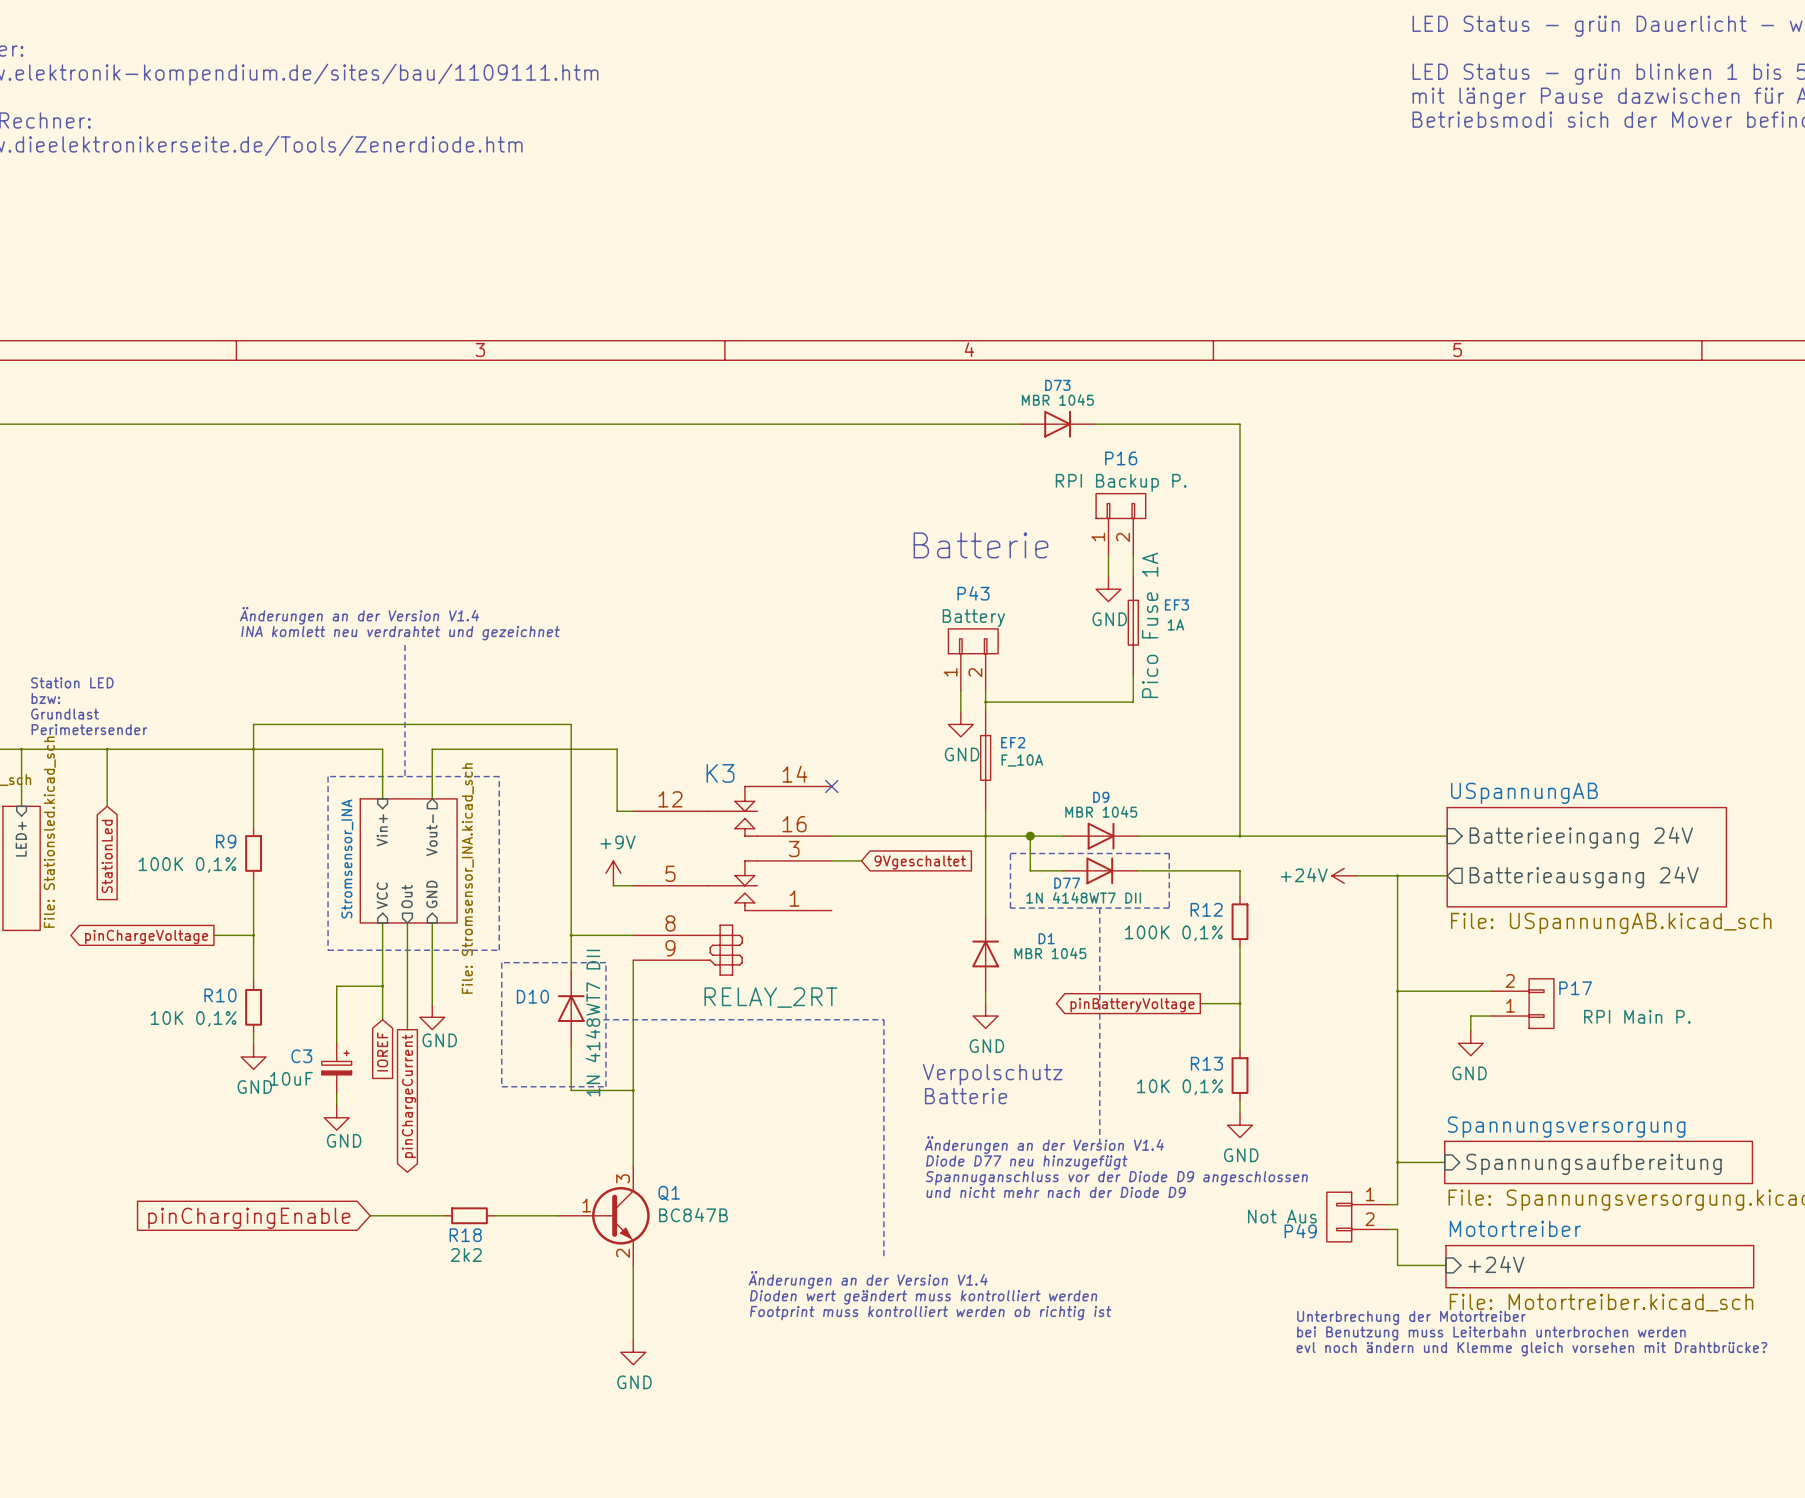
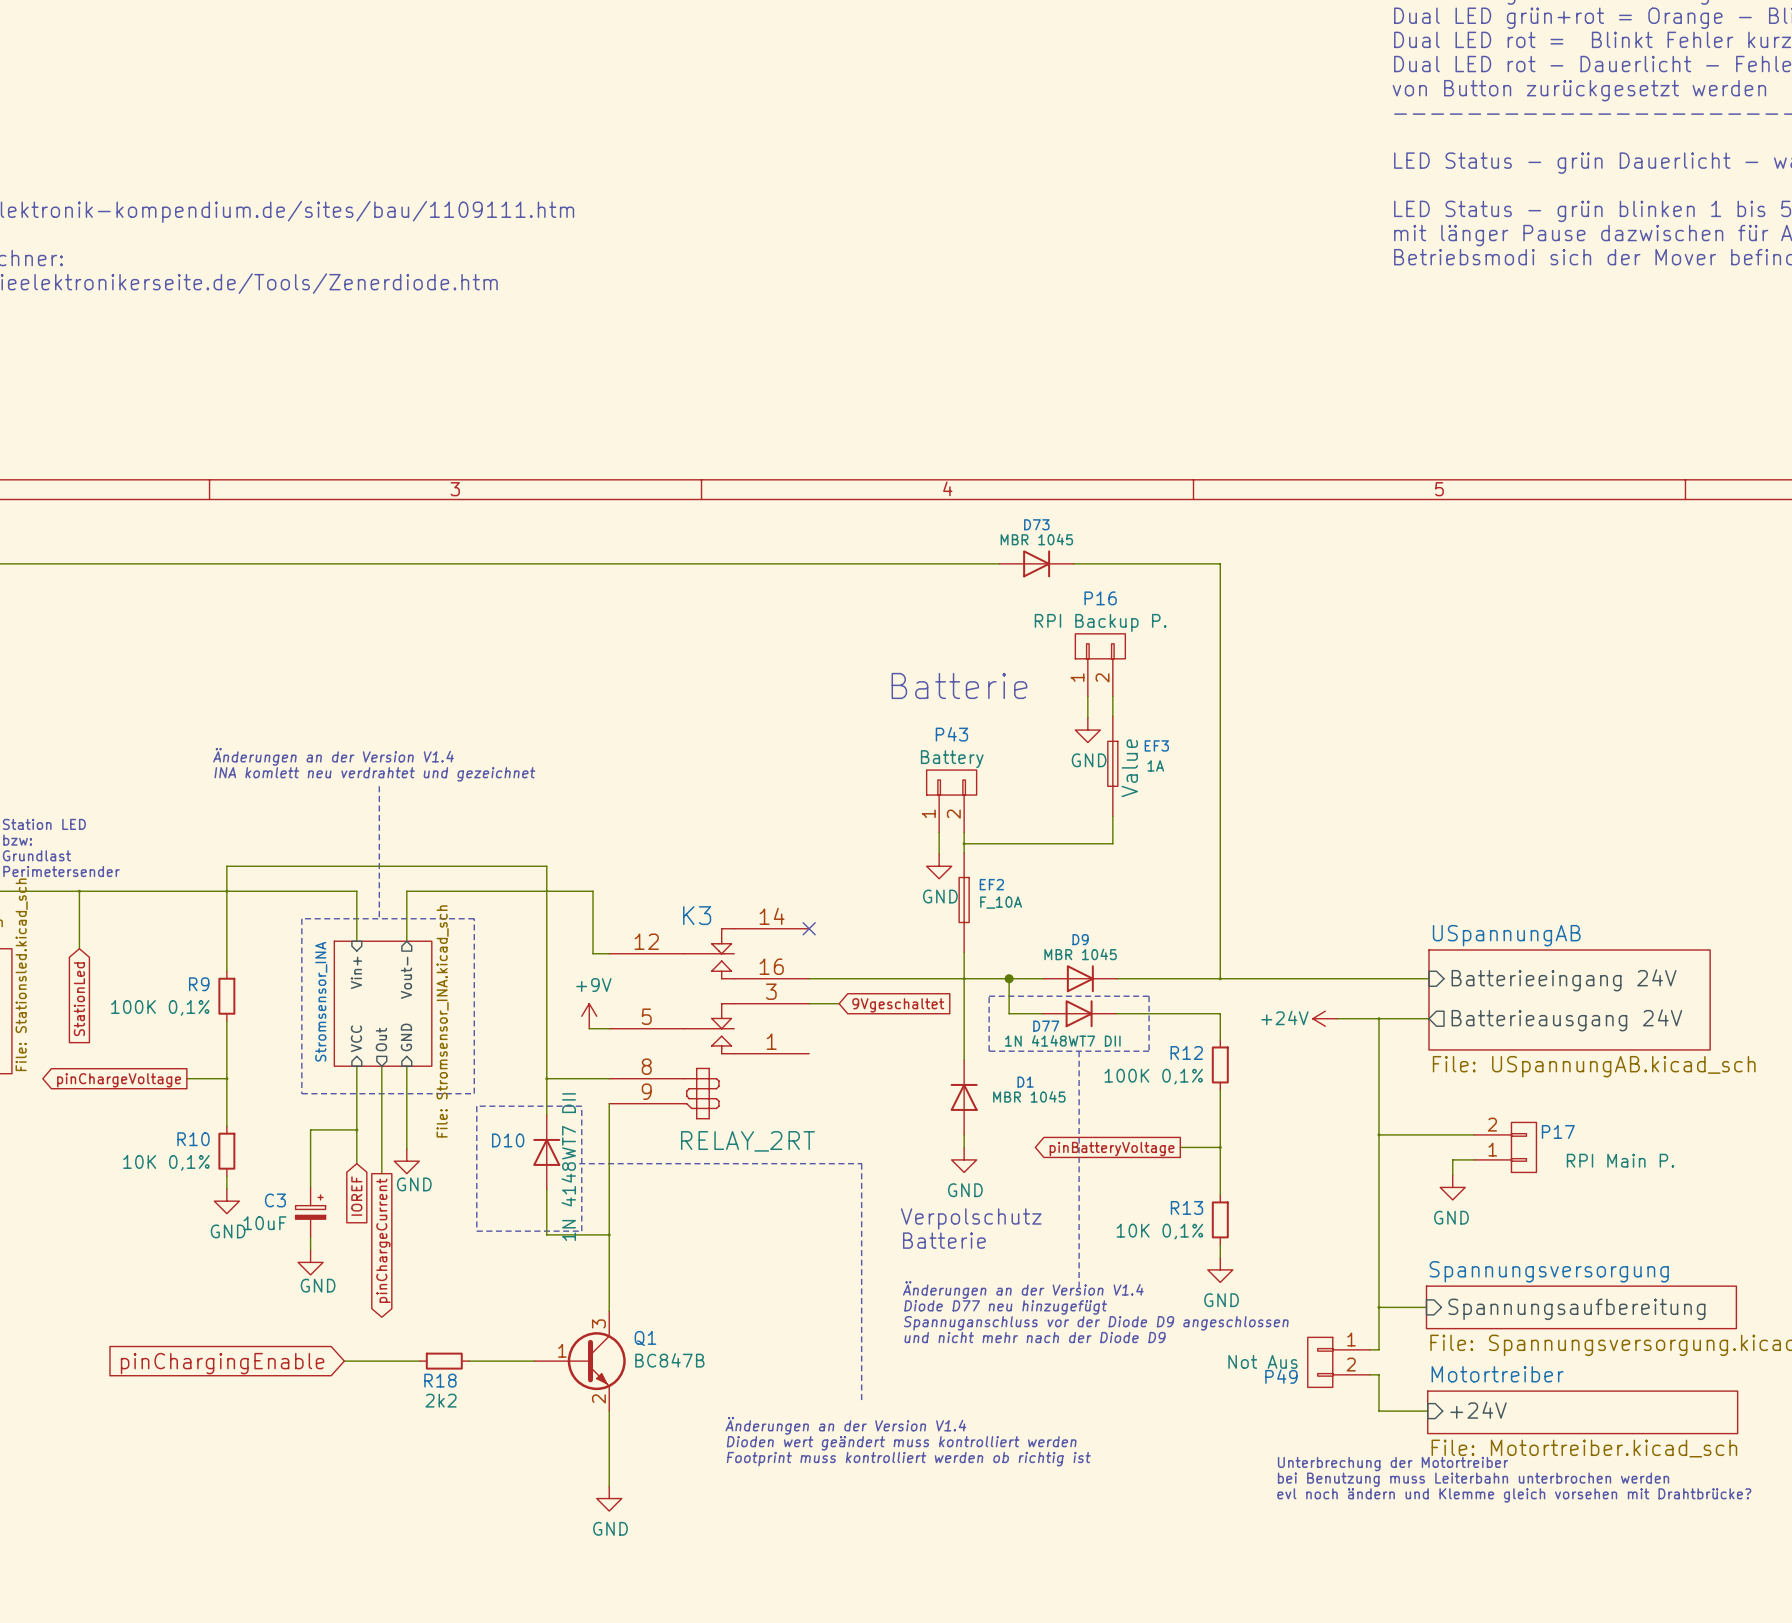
EF3 text: Pico Fuse 1A (1150, 625) -> Value (1129, 768)

